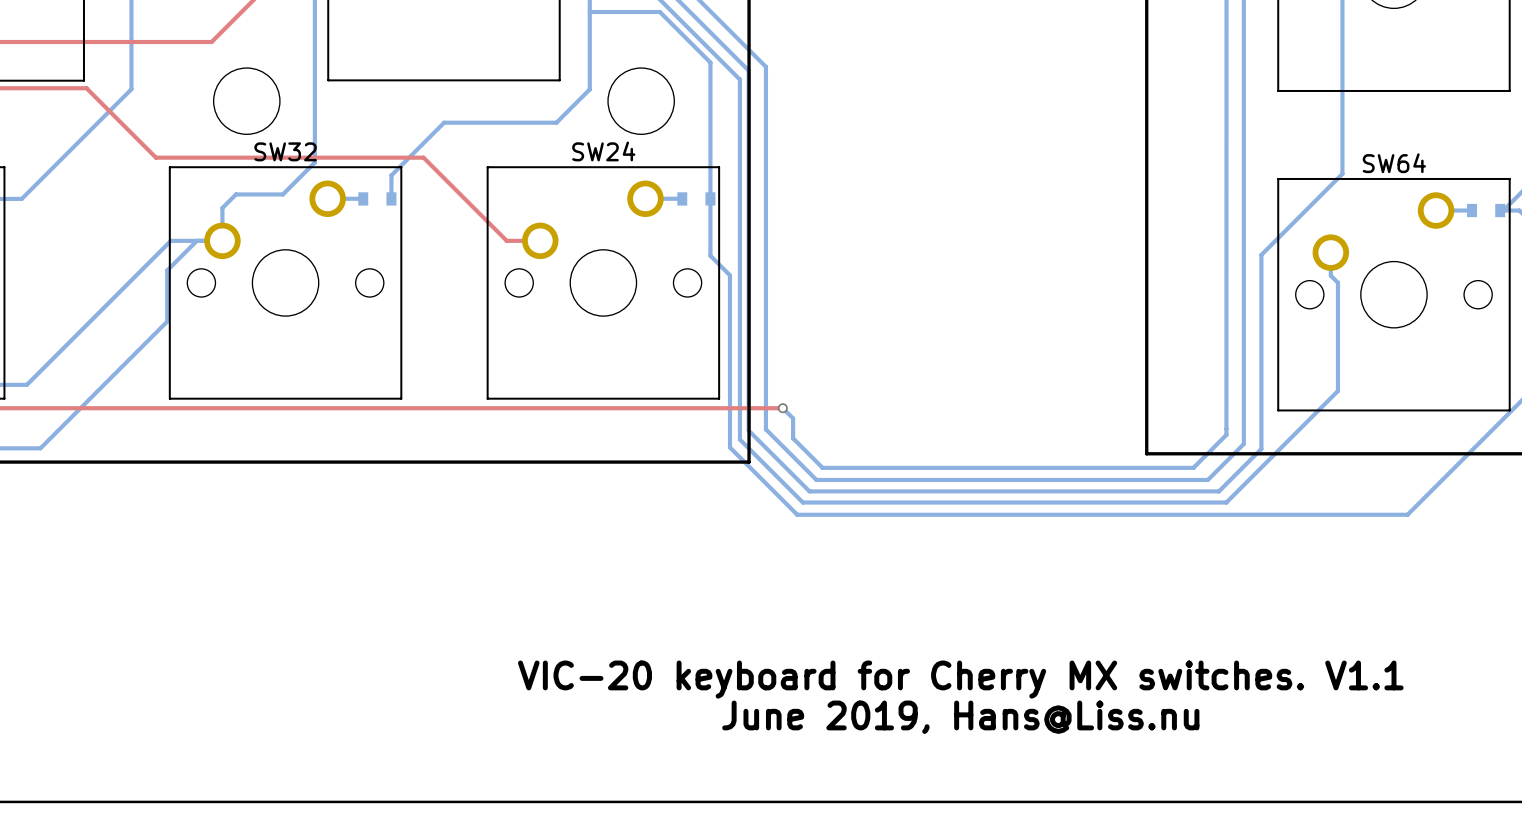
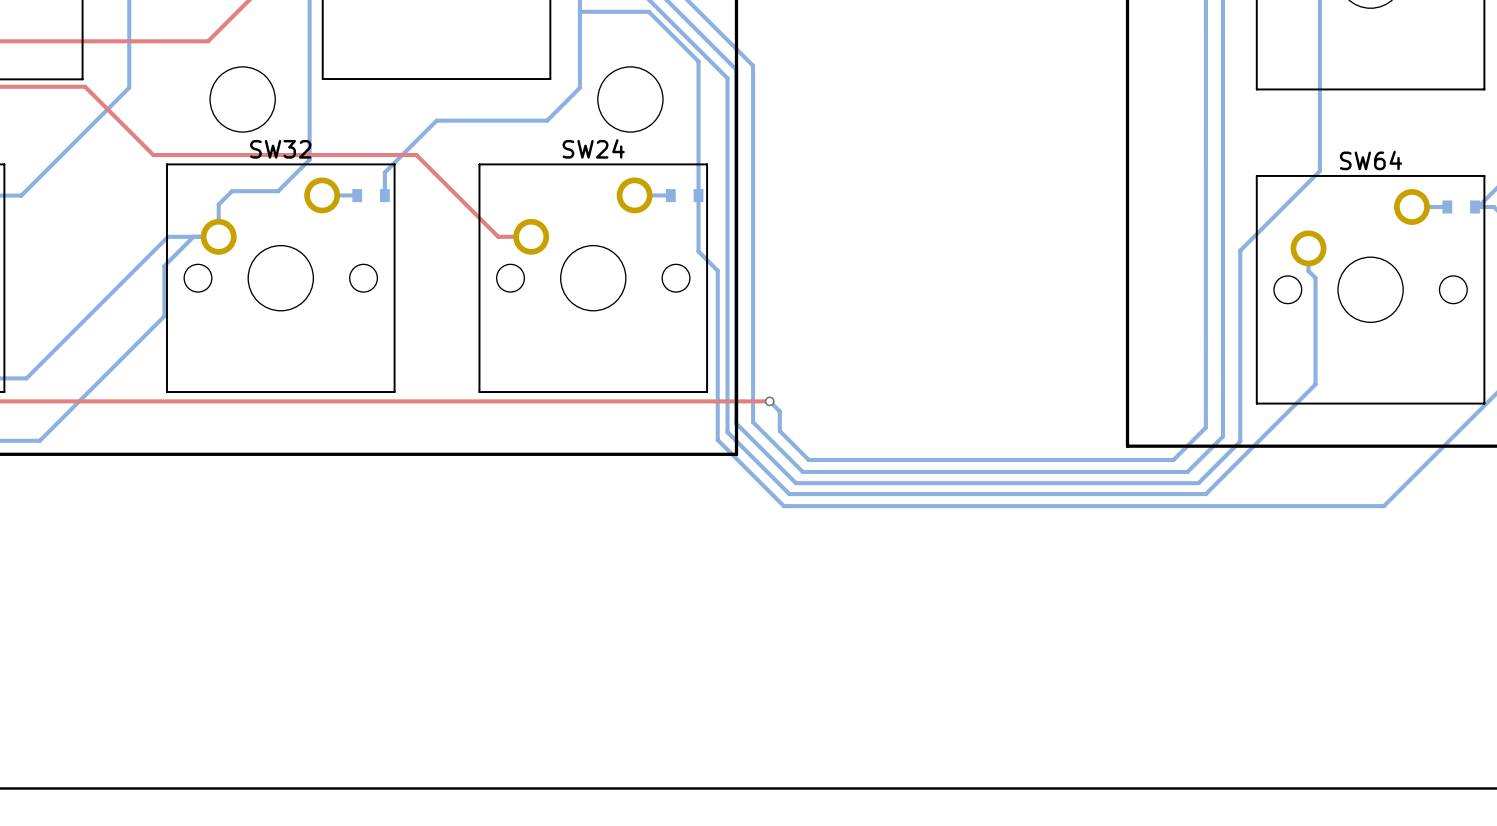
text: VIC-20 keyboard for Cherry MX switches. V1.1 (960, 679) -> none
text: June 2019, Hans@Liss.nu (960, 717) -> none

